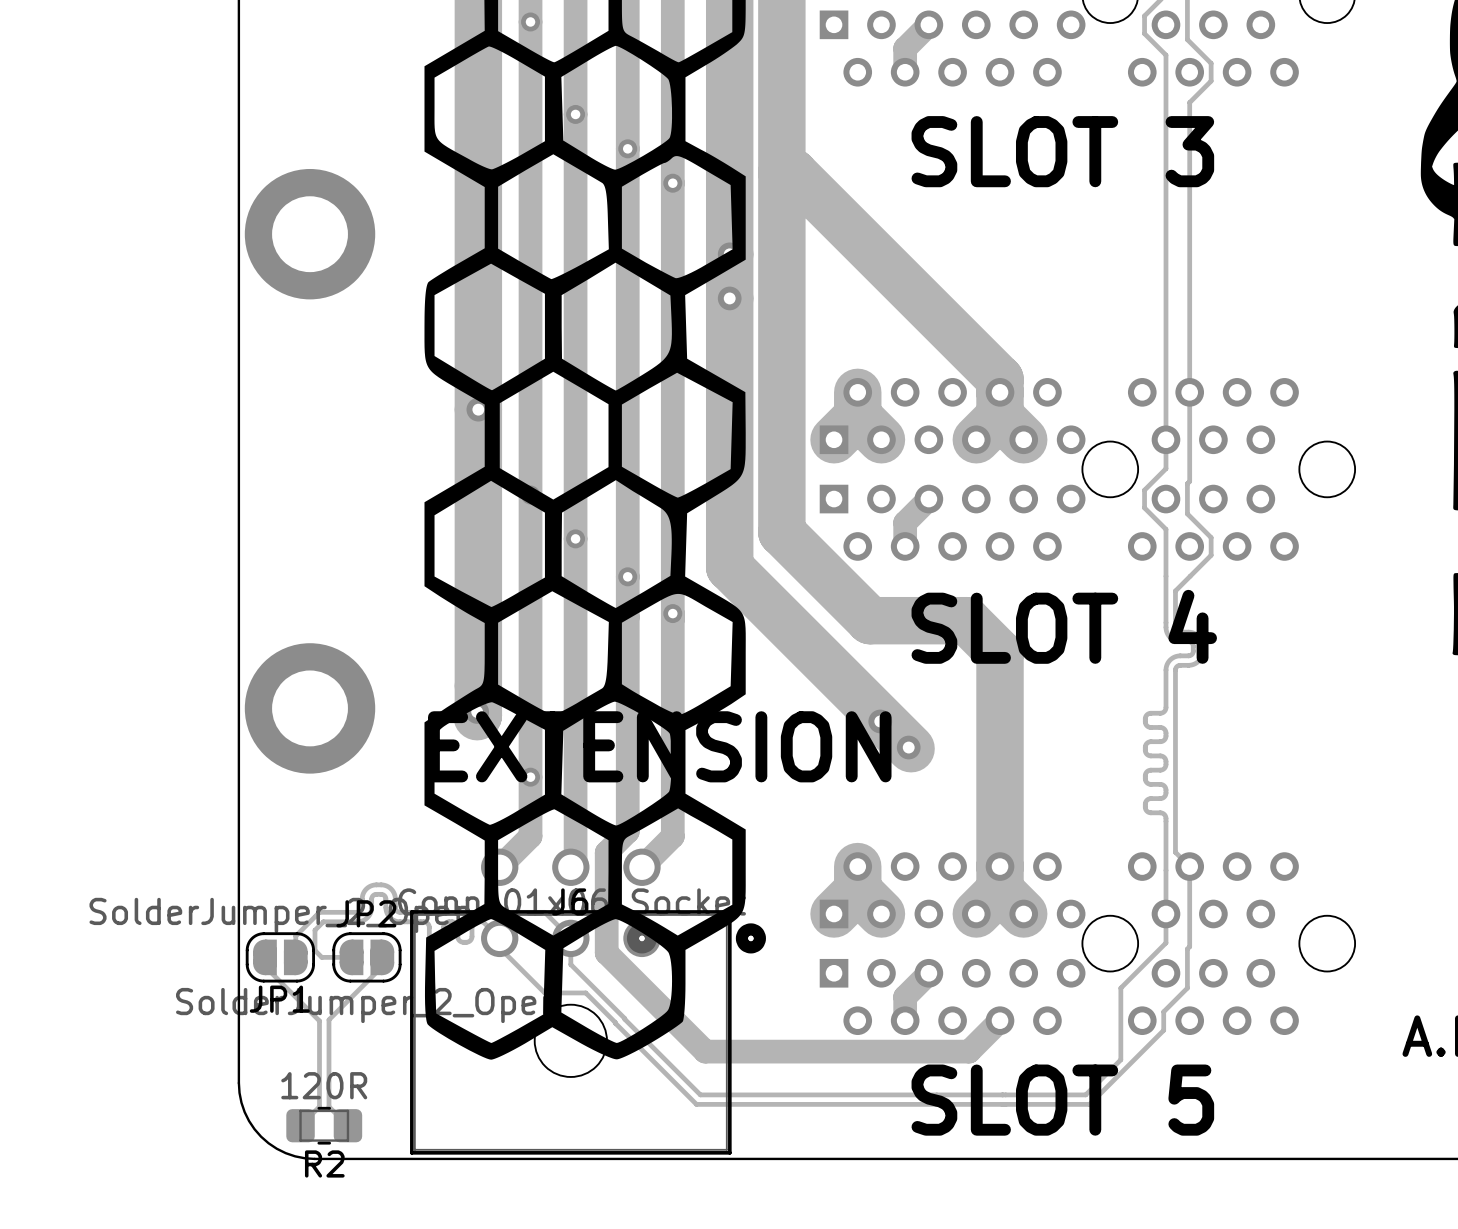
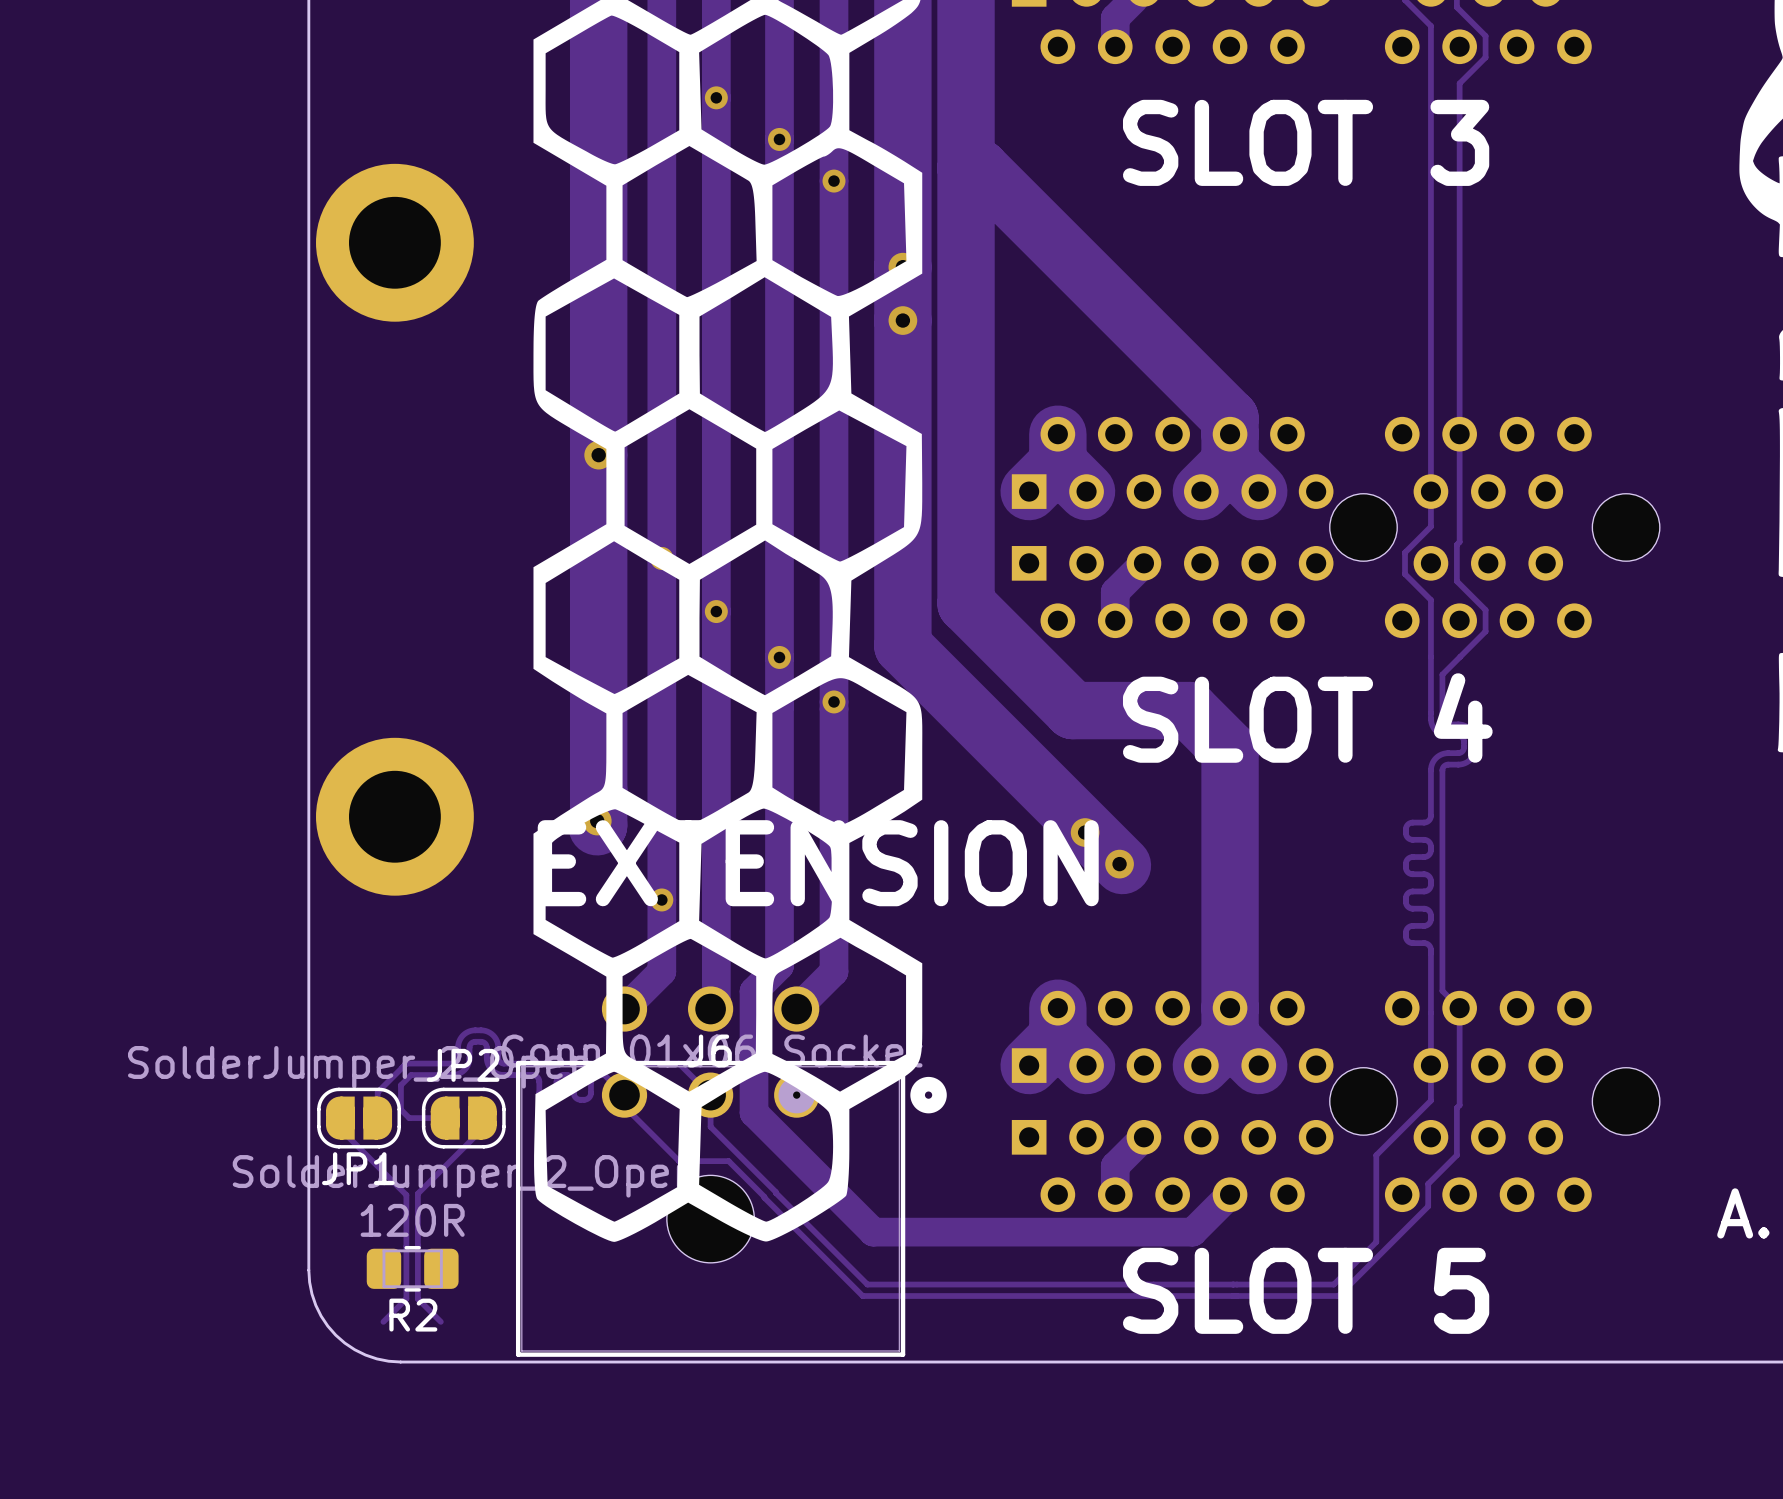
R2 position: (324, 1125) -> (412, 1268)

